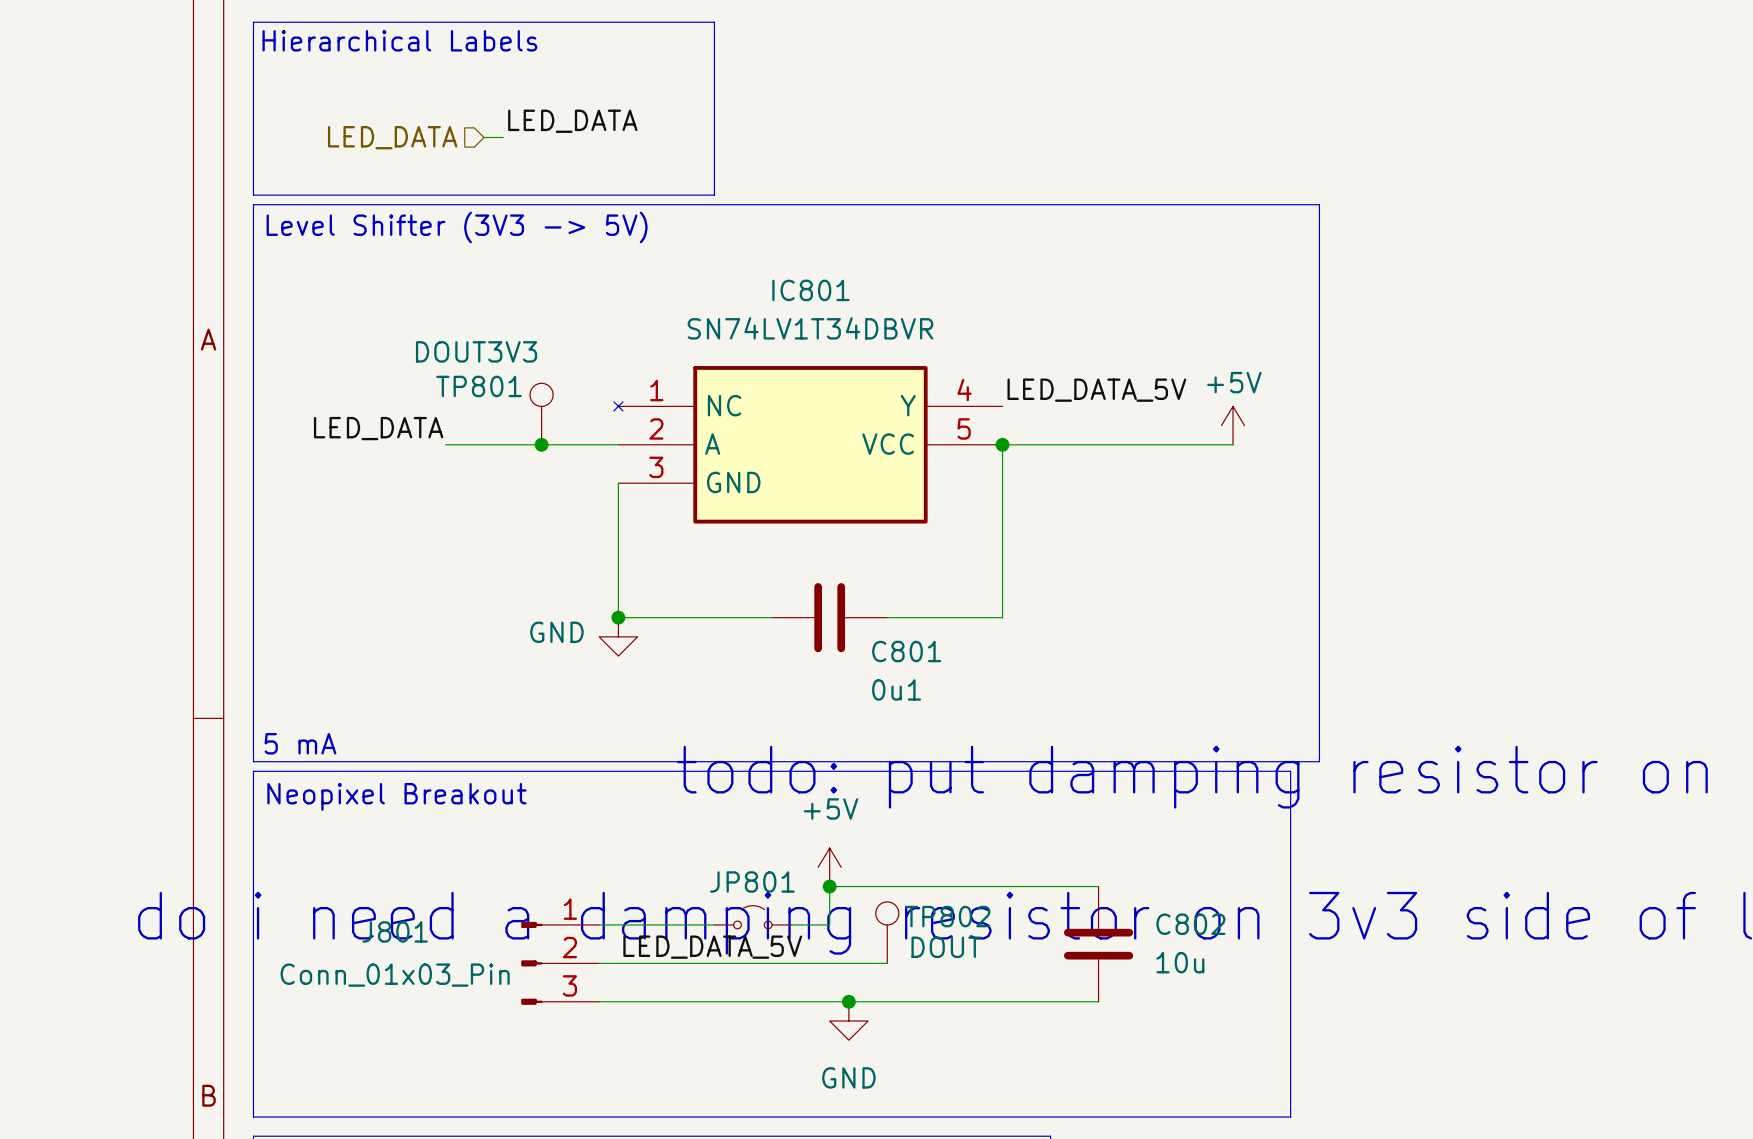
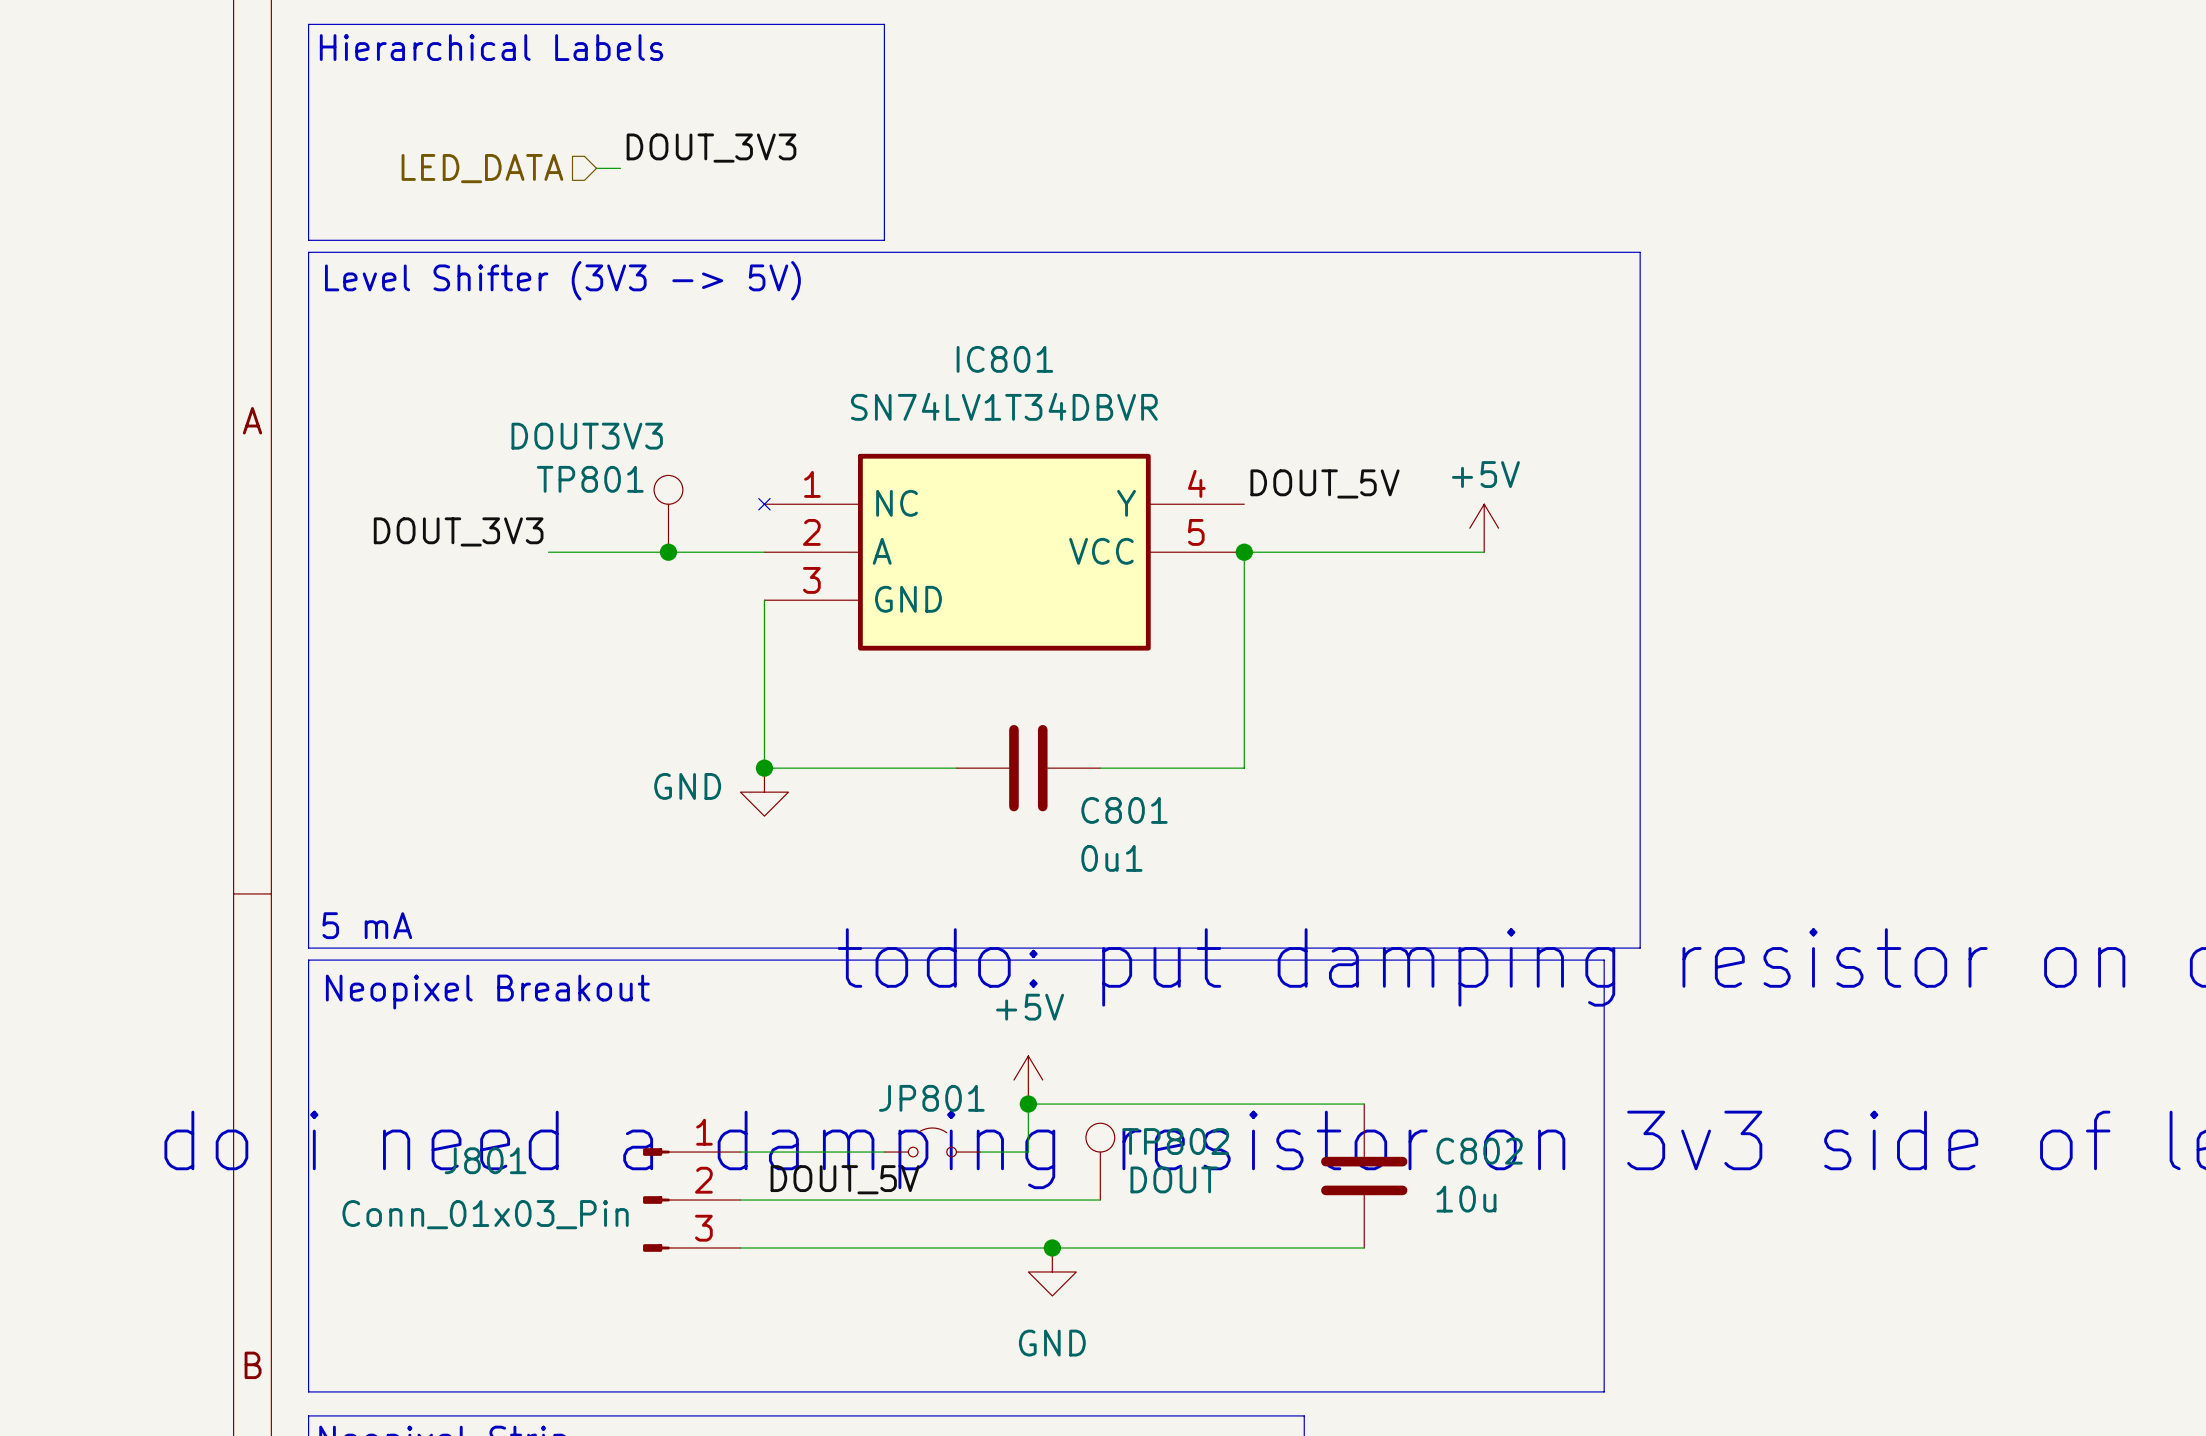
label: LED_DATA (572, 121) -> DOUT_3V3 (711, 148)
label: LED_DATA_5V (1096, 390) -> DOUT_5V (1325, 483)
power symbol position: +5V (1233, 425) -> +5V (1484, 528)
label: LED_DATA (378, 428) -> DOUT_3V3 (458, 531)
wire: (1194, 444) (1233, 444) -> none
label: LED_DATA_5V (712, 947) -> DOUT_5V (845, 1179)

